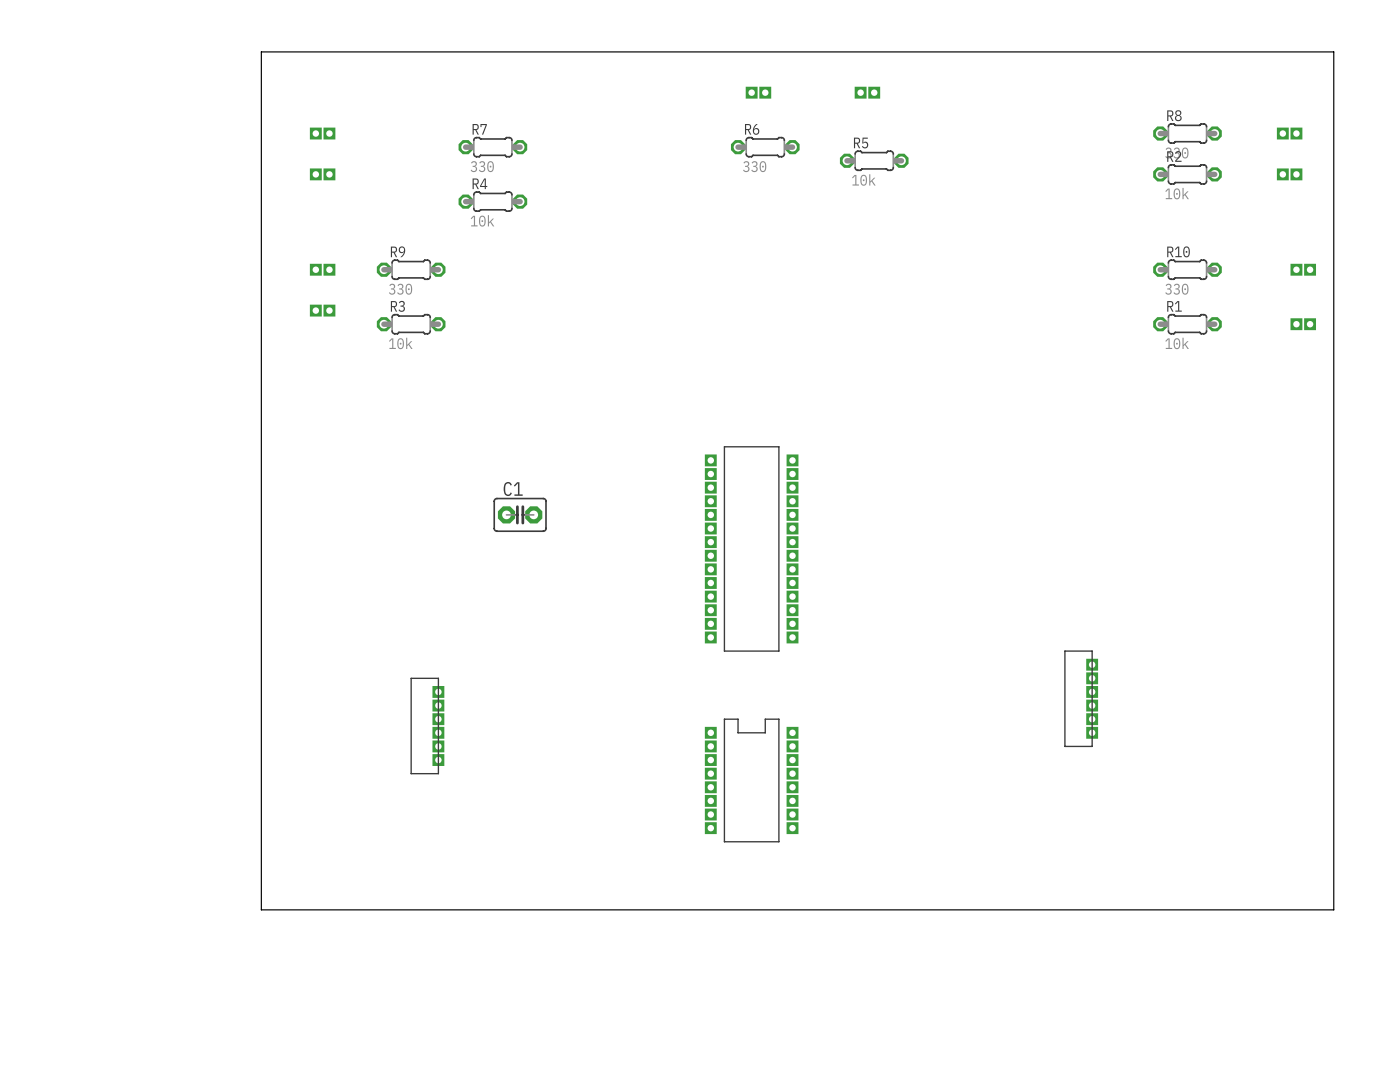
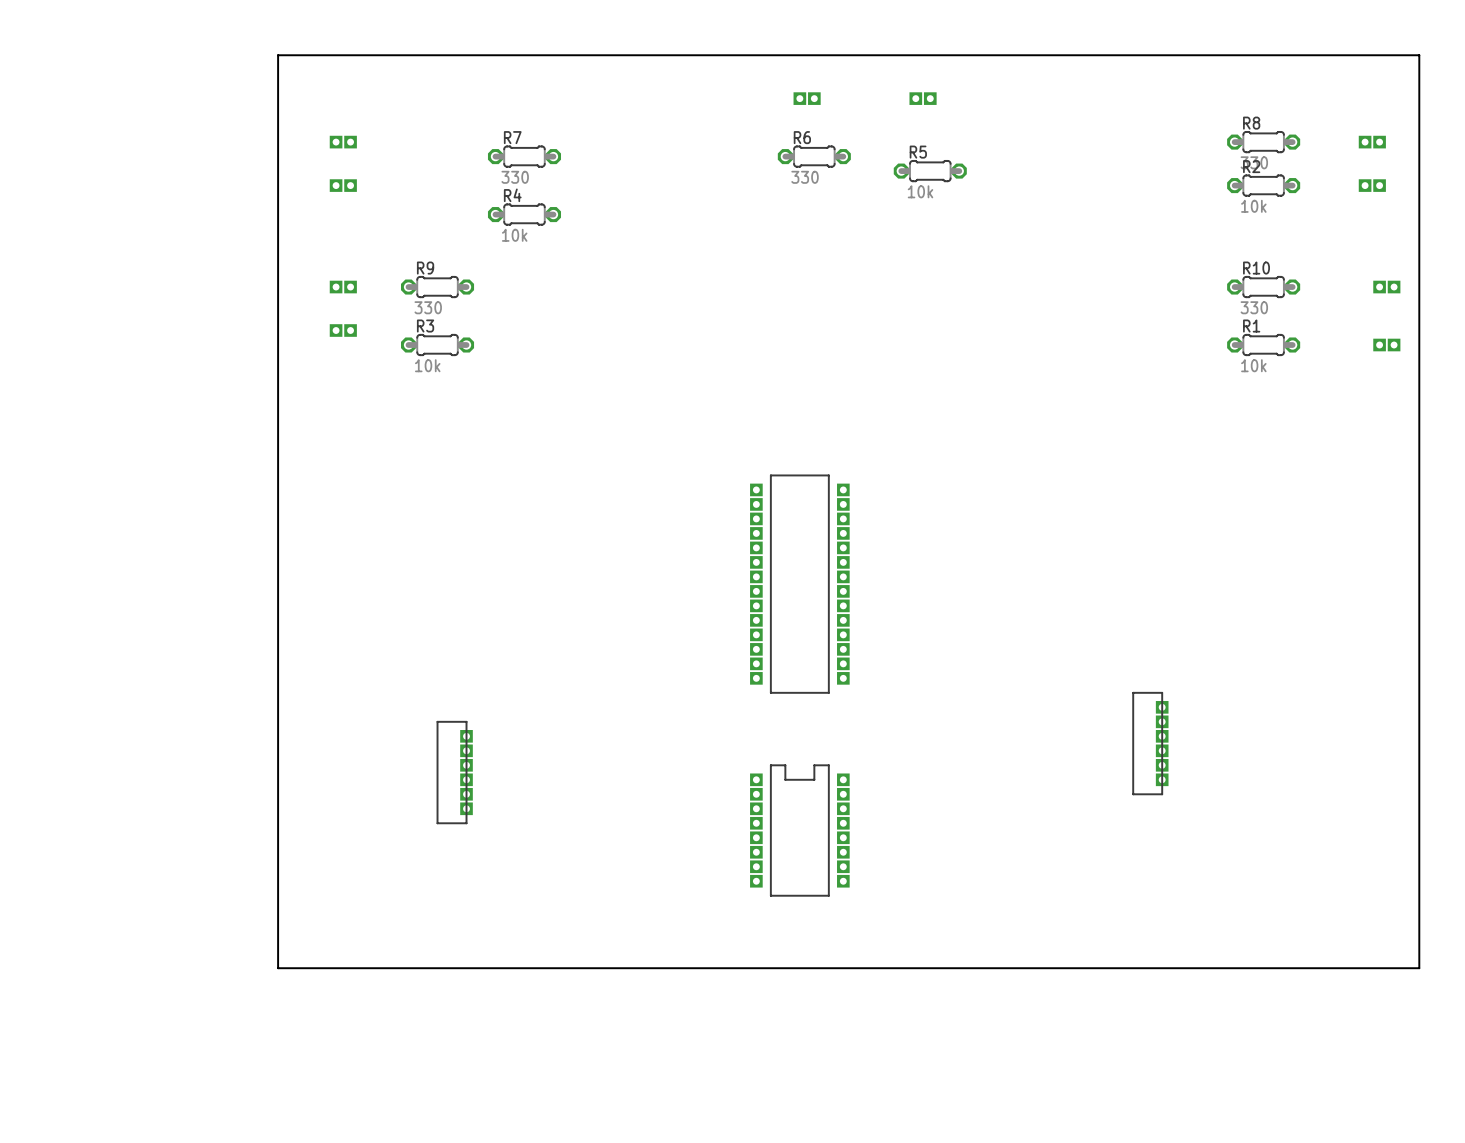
C1: (520, 514) -> none

